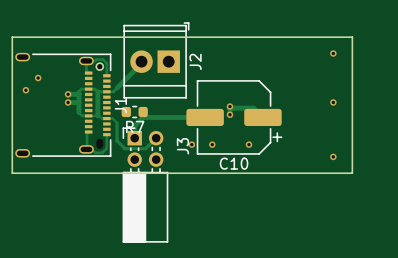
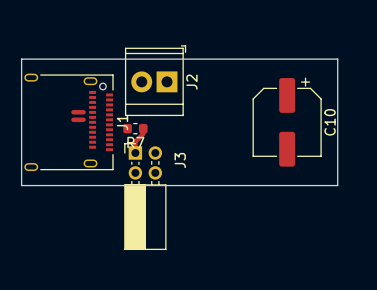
via: (333, 53) -> none
track: (141, 61) (113, 91) (97, 91) -> none
track: (88, 73) (86, 70) (86, 60) (103, 59) (106, 63) (106, 75) -> none
via: (38, 78) -> none
via: (25, 90) -> none
track: (97, 91) (95, 89) (81, 89) (78, 91) (78, 112) (82, 115) (112, 118) (117, 122) (117, 140) (124, 148) (145, 148) (156, 138) -> none
track: (97, 91) (97, 115) -> none
via: (68, 94) -> none
via: (68, 102) -> none
via: (333, 102) -> none
via: (229, 106) -> none
track: (229, 109) (253, 108) (262, 117) -> none
track: (143, 112) (143, 117) (205, 117) -> none
via: (229, 114) -> none
C10 rotation: 0° (234, 117) -> 90° counterclockwise (287, 122)
C10 position: (234, 117) -> (287, 122)
track: (88, 131) (86, 149) (91, 149) (95, 152) (102, 152) (106, 148) (106, 134) -> none
via: (191, 144) -> none
via: (212, 144) -> none
via: (249, 144) -> none
via: (333, 156) -> none

